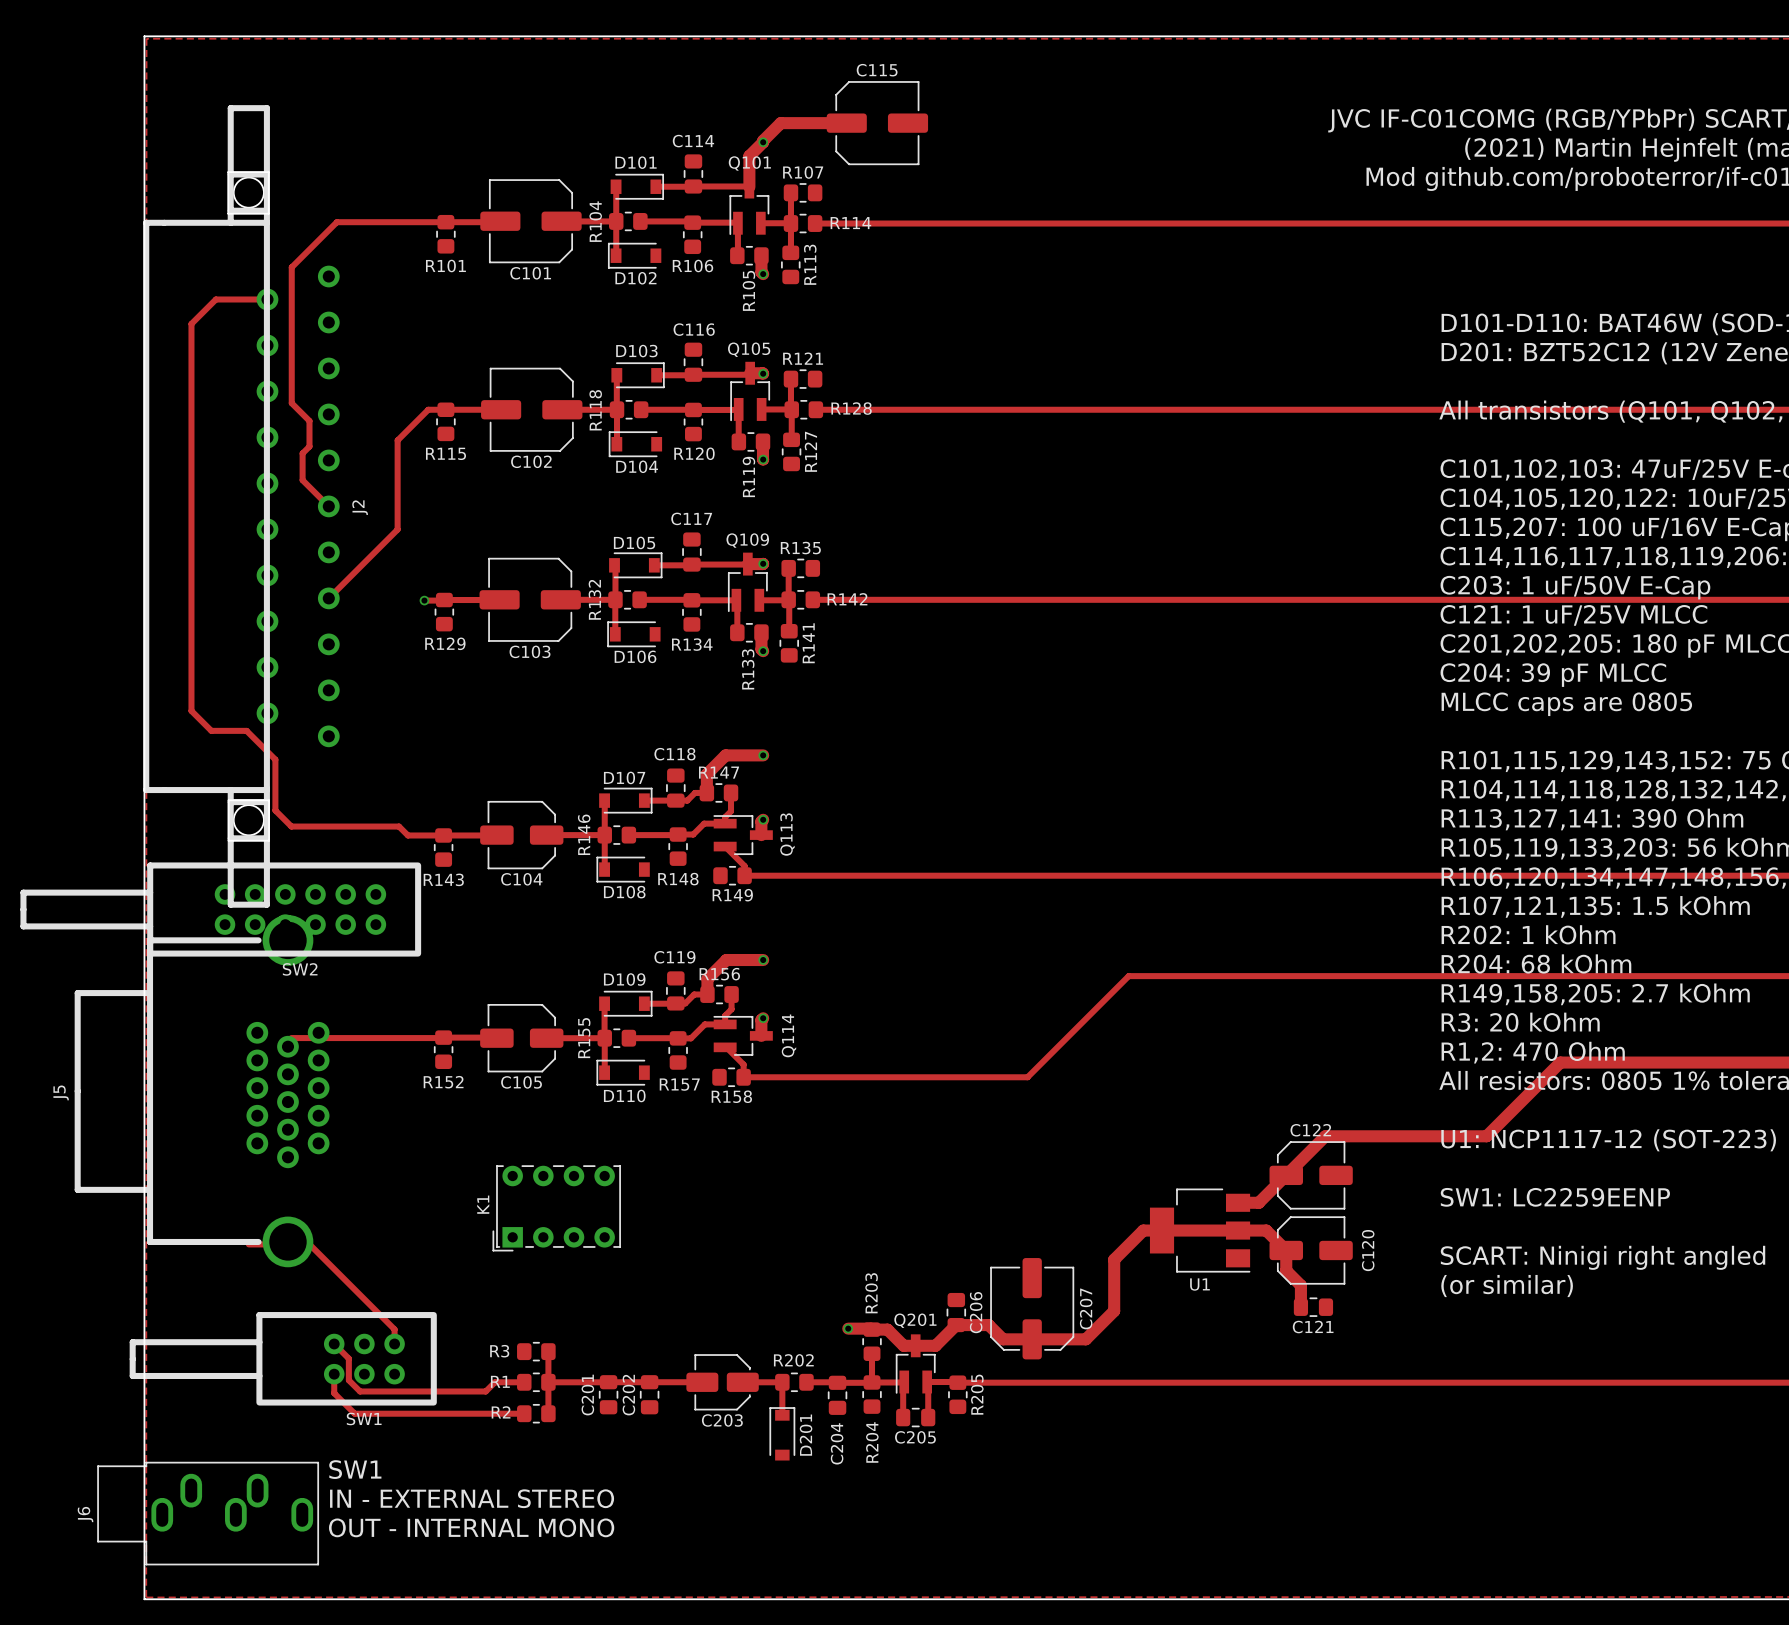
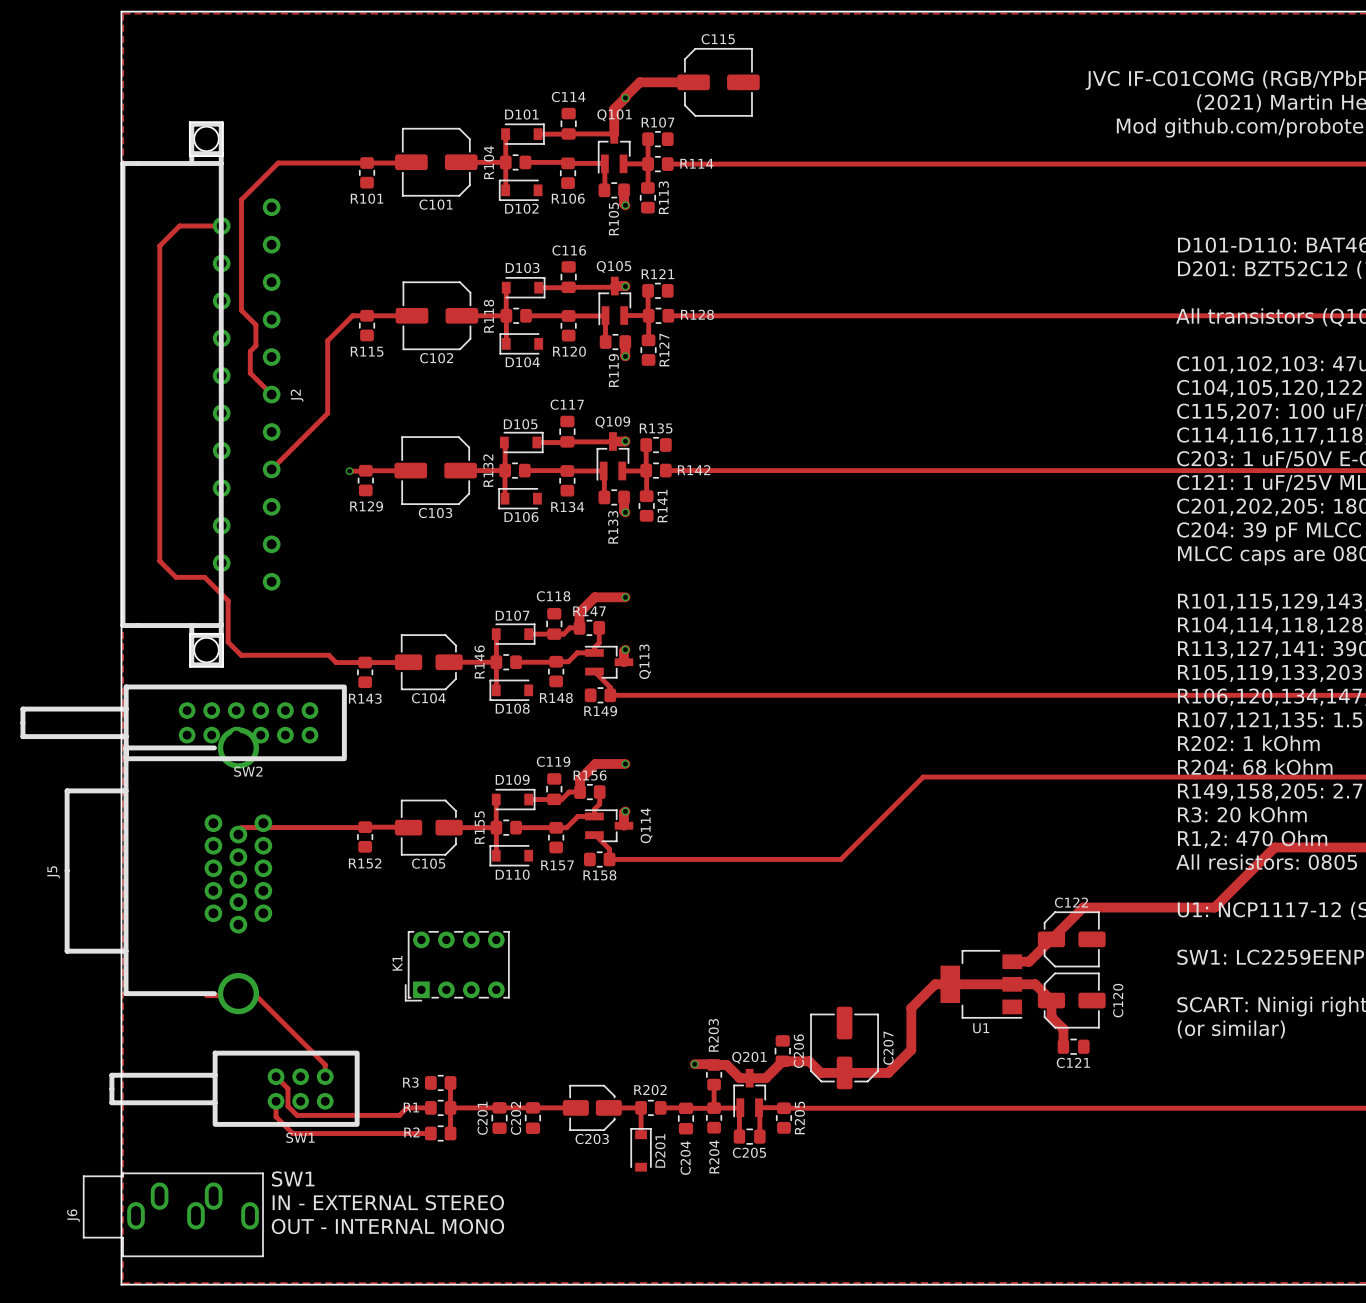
J2 footprint: [143, 105, 340, 908] -> [120, 121, 281, 668]

